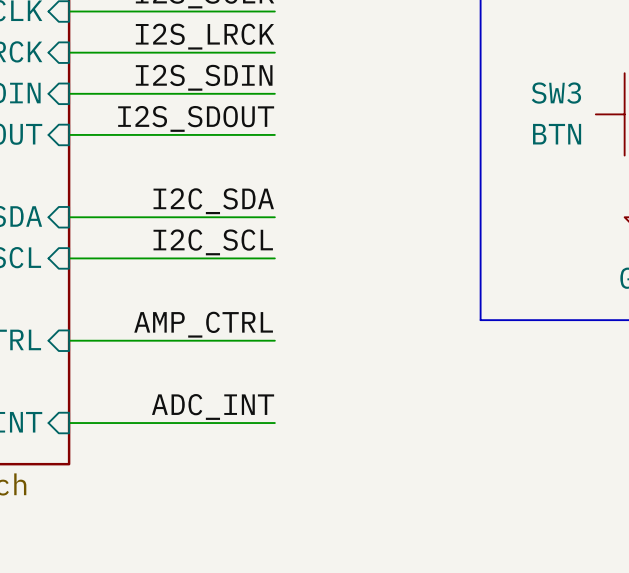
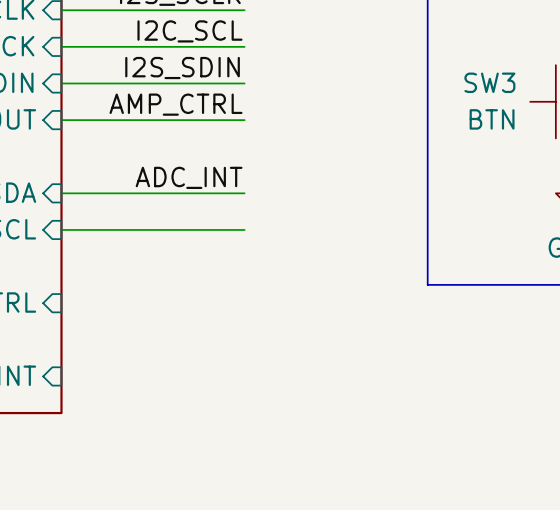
label: I2S_LRCK (205, 36) -> I2C_SCL (189, 31)
label: I2S_SDOUT (196, 118) -> AMP_CTRL (176, 104)
label: I2C_SDA (213, 201) -> ADC_INT (189, 177)
label: I2C_SCL (213, 242) -> none
label: AMP_CTRL (203, 324) -> none
wire: (69, 340) (274, 340) -> none
label: ADC_INT (213, 406) -> none
wire: (69, 423) (274, 423) -> none

